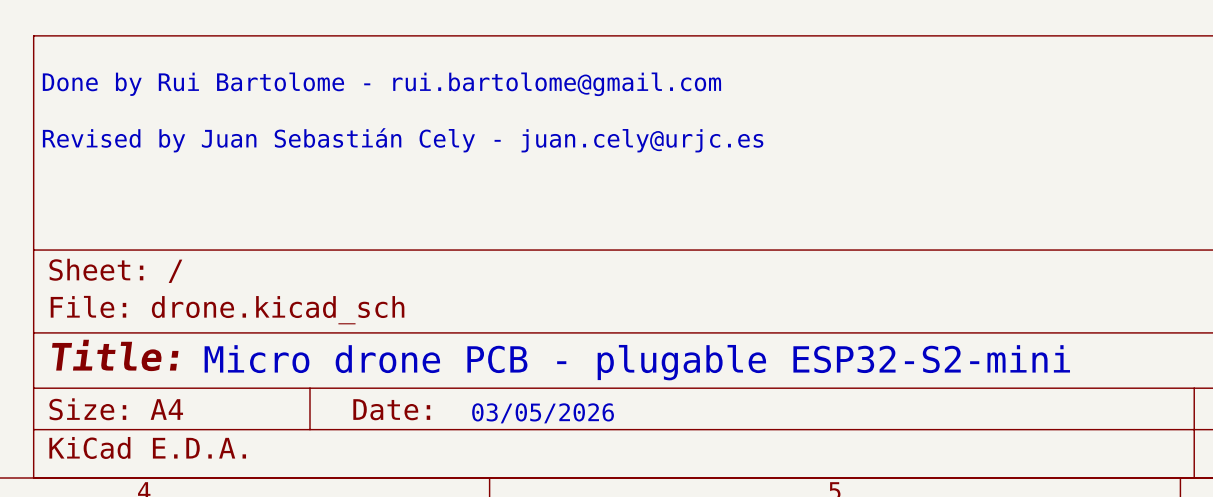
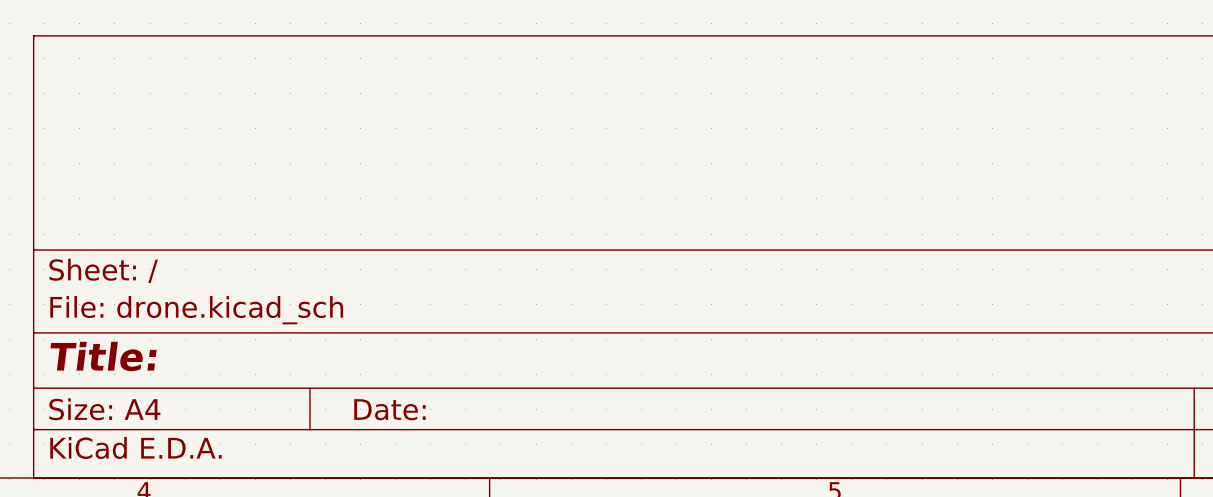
text: Done by Rui Bartolome - rui.bartolome@gmail.com (381, 84) -> none
text: Revised by Juan Sebastián Cely - juan.cely@urjc.es (403, 140) -> none
text: Micro drone PCB - plugable ESP32-S2-mini (637, 362) -> none
text: 03/05/2026 (543, 413) -> none

